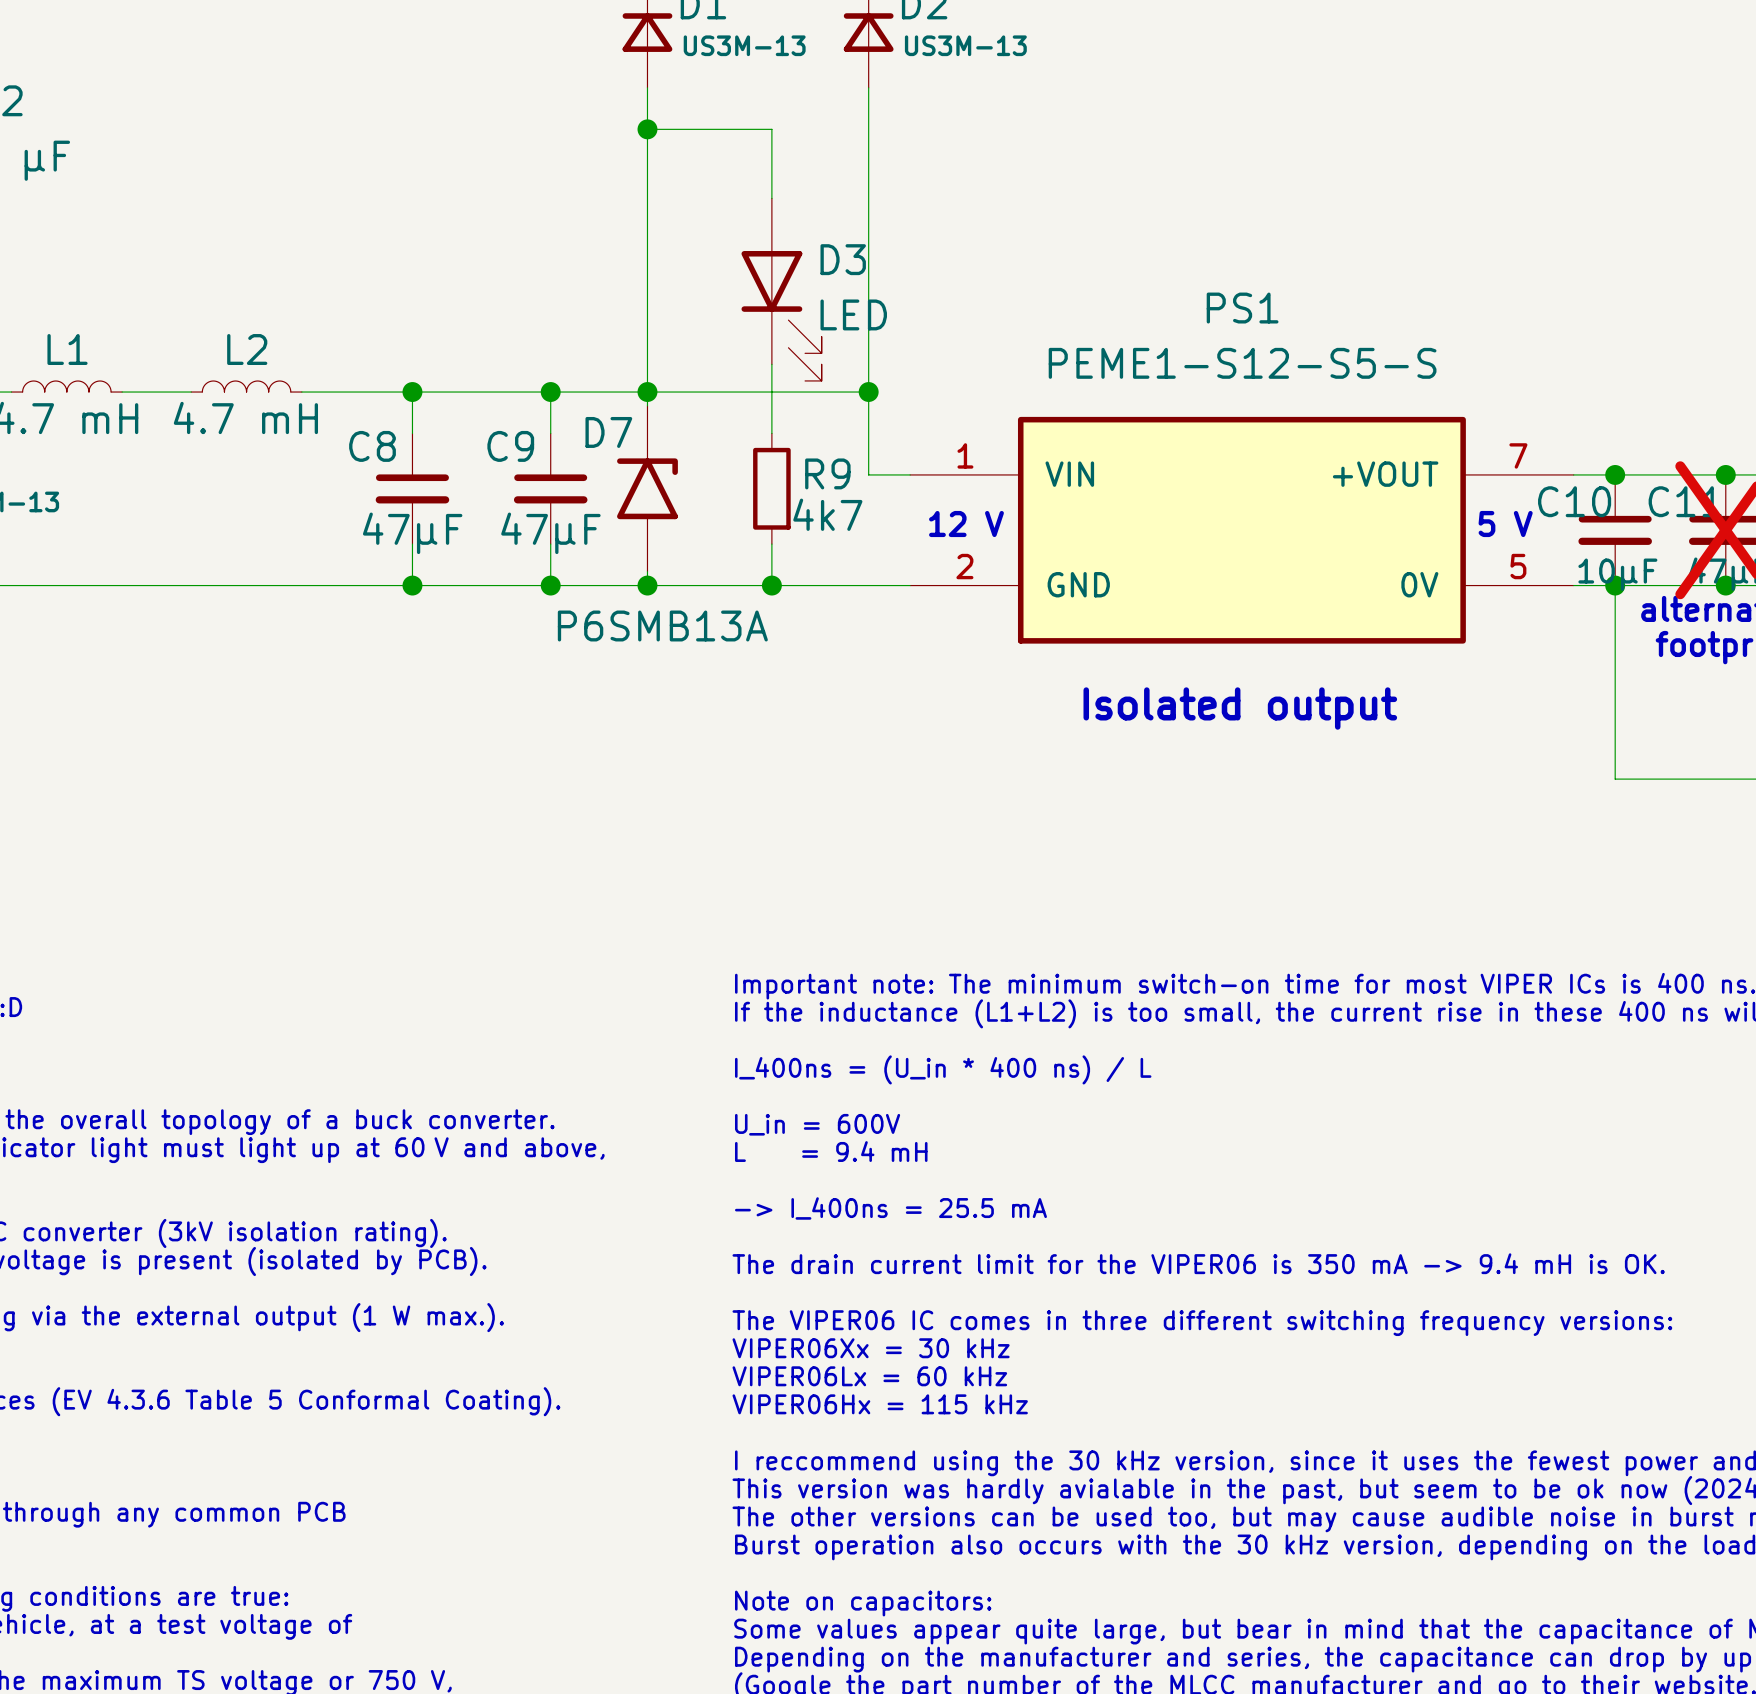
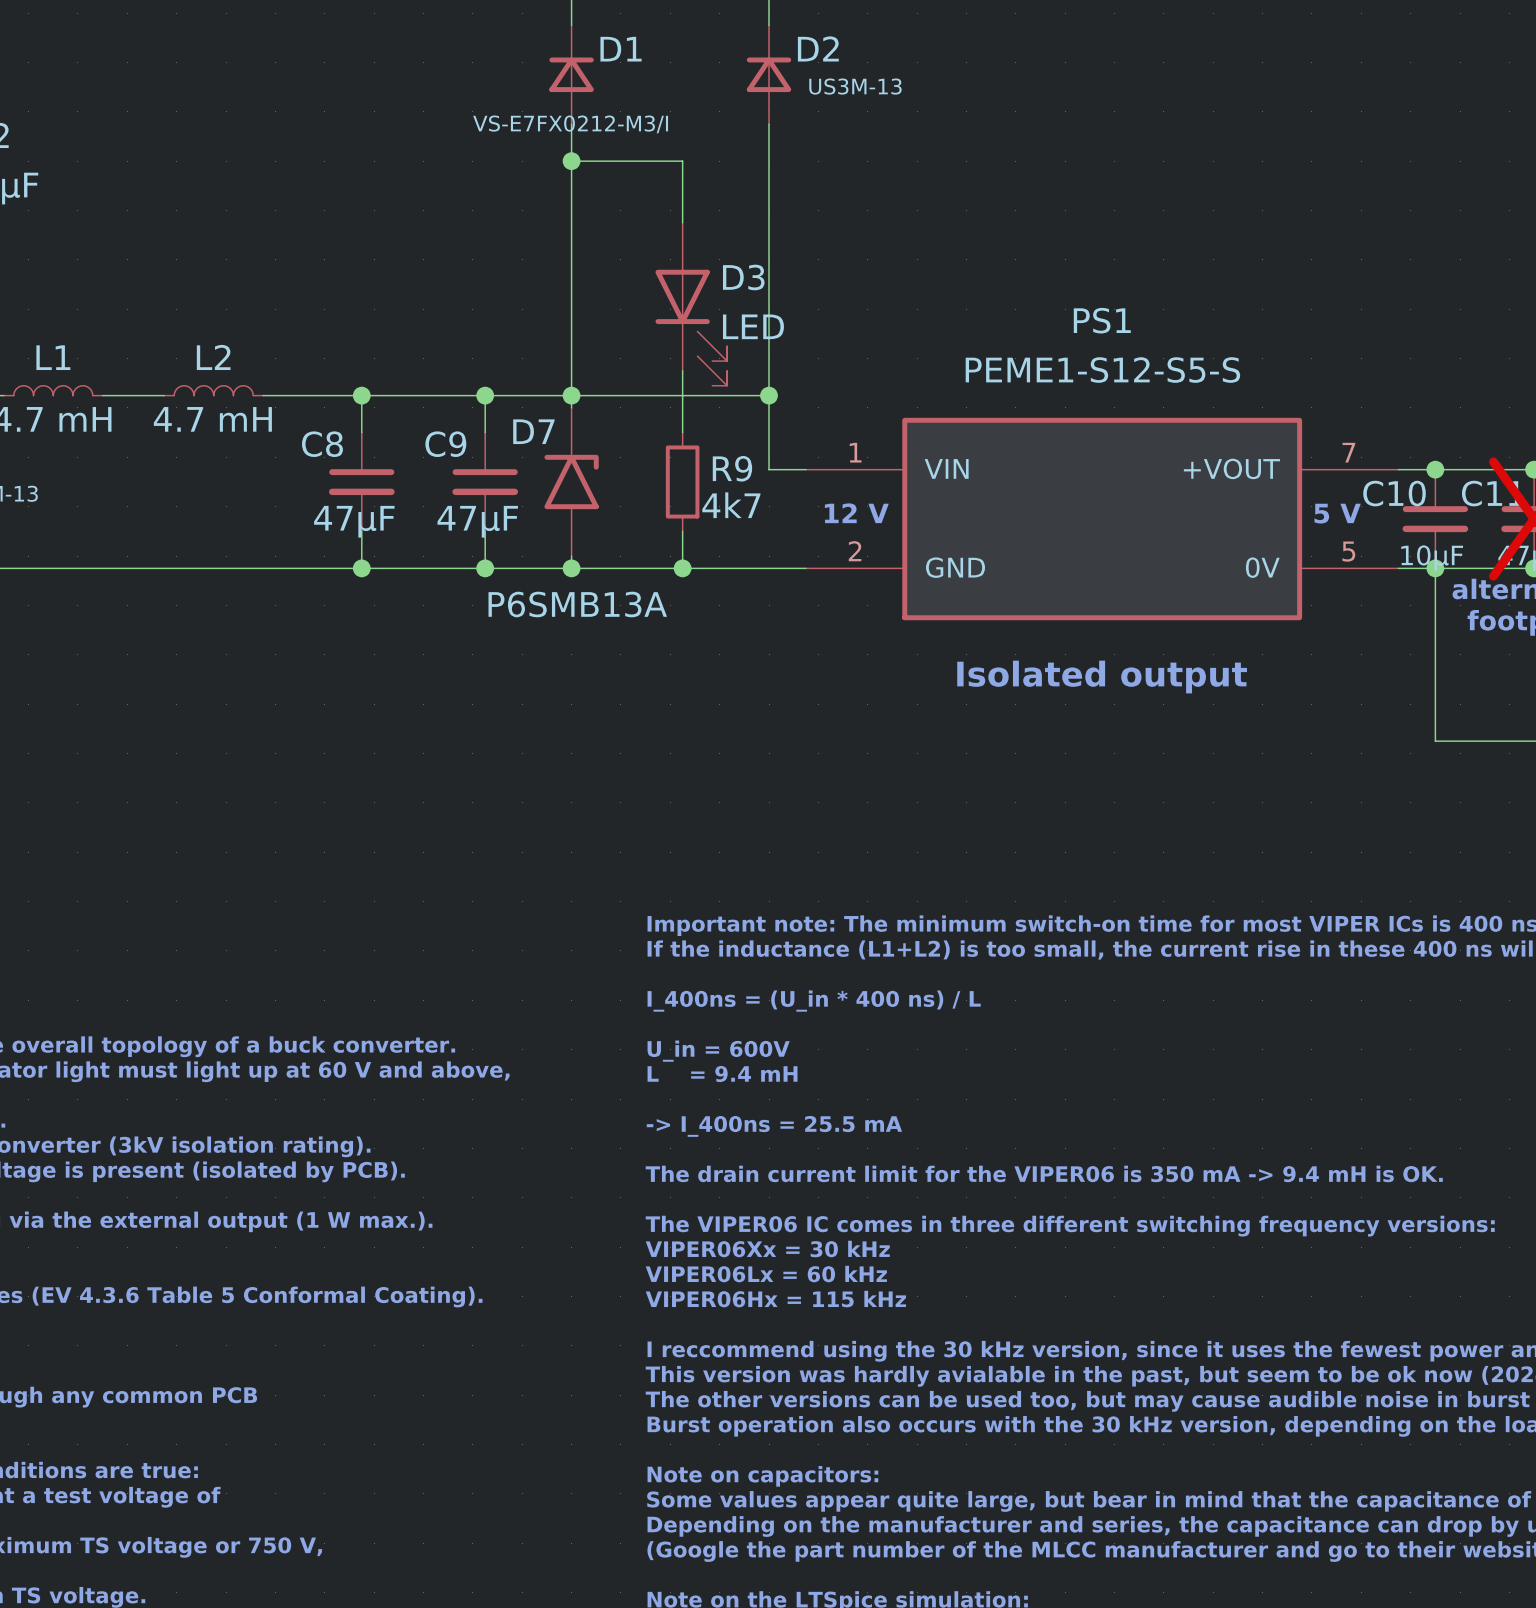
D1 value: US3M-13 (744, 45) -> VS-E7FX0212-M3/I (570, 124)

